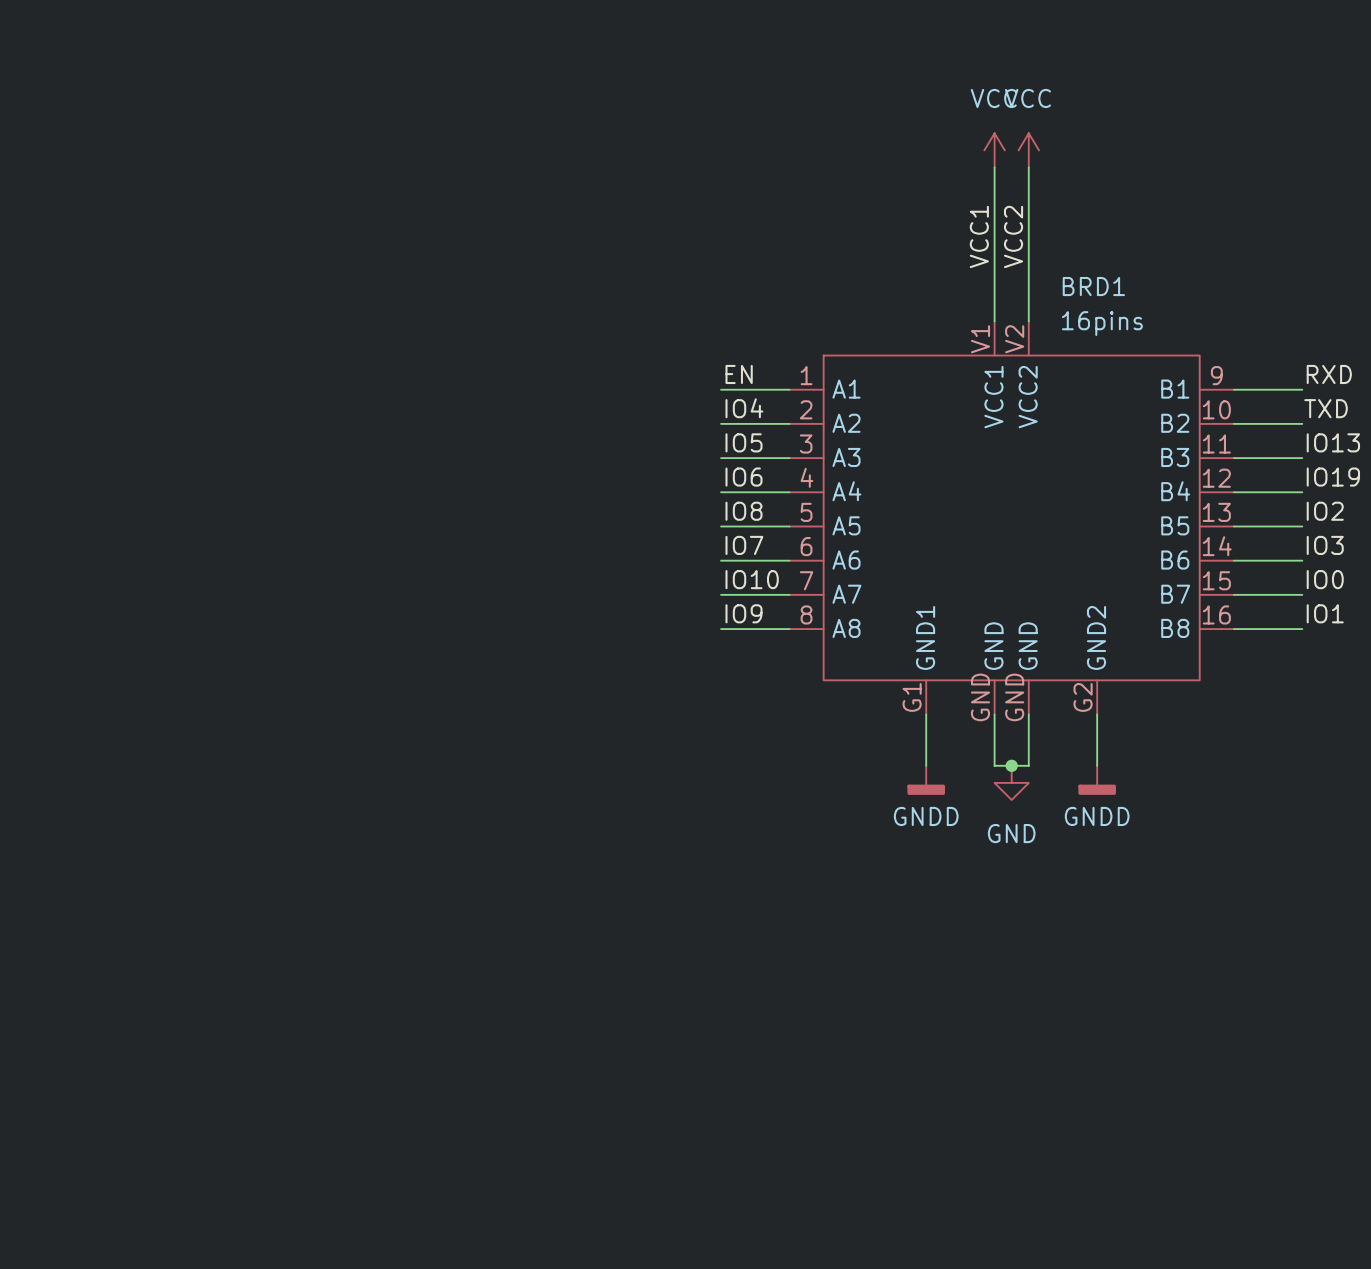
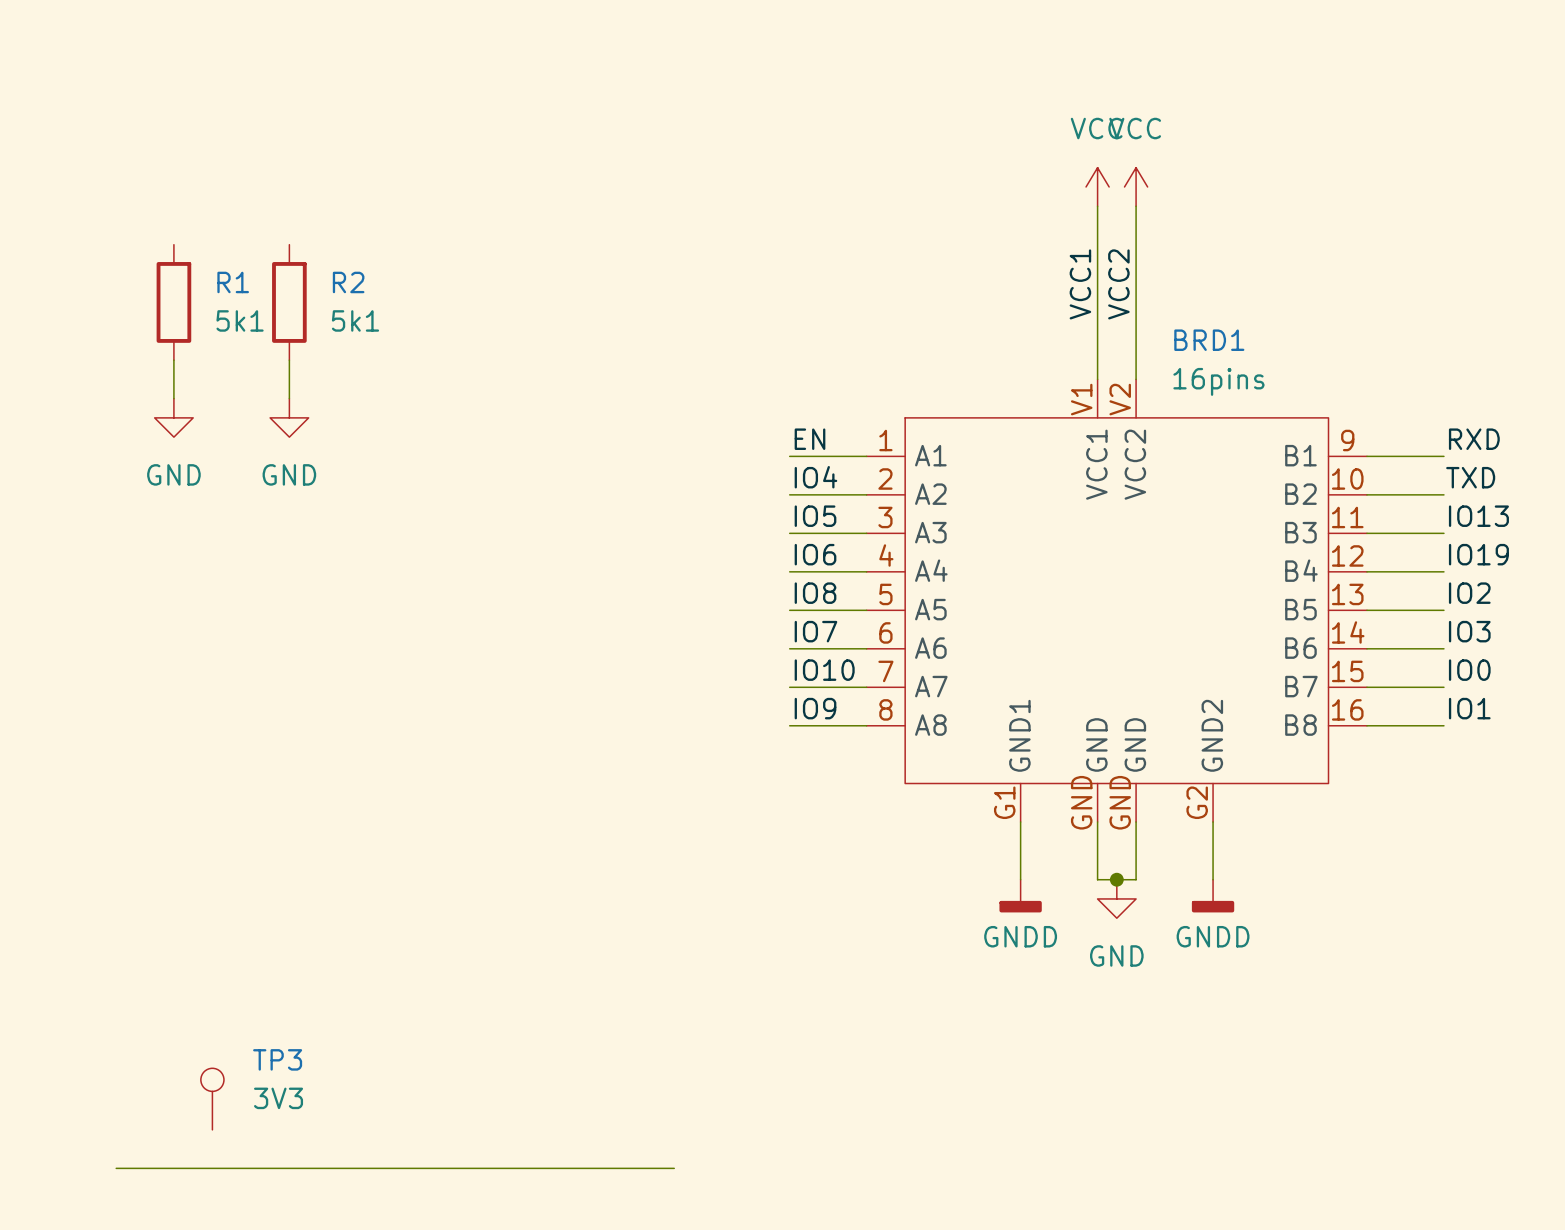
R1: none -> 5k1 (173, 302)
R2: none -> 5k1 (289, 302)
wire: none -> (173, 360) (173, 398)
wire: none -> (289, 360) (289, 398)
power symbol: none -> GND (173, 417)
power symbol: none -> GND (289, 417)
TP3: none -> 3V3 (212, 1099)
wire: none -> (116, 1168) (674, 1168)

